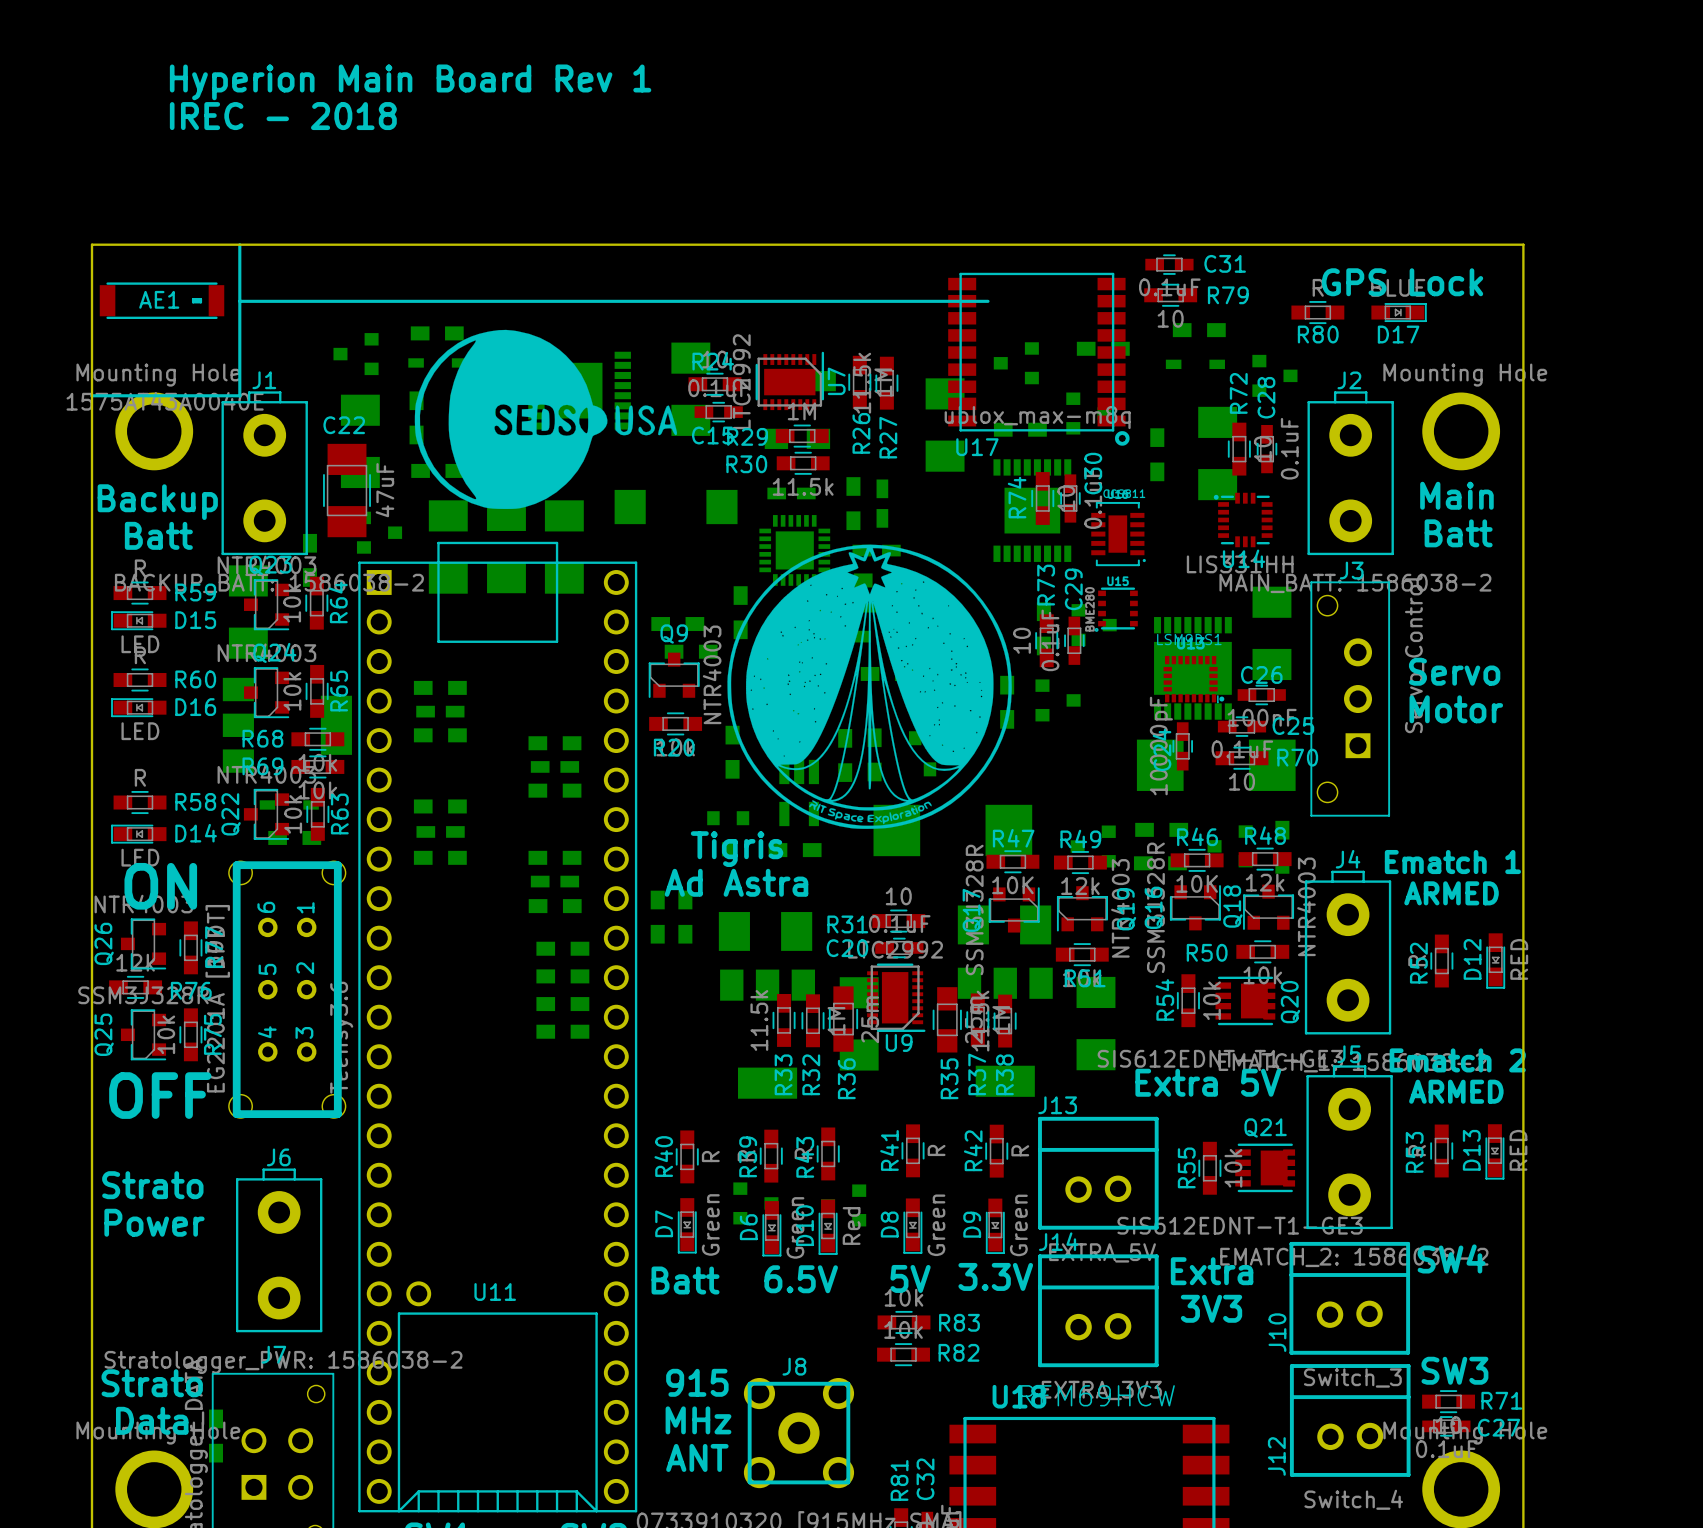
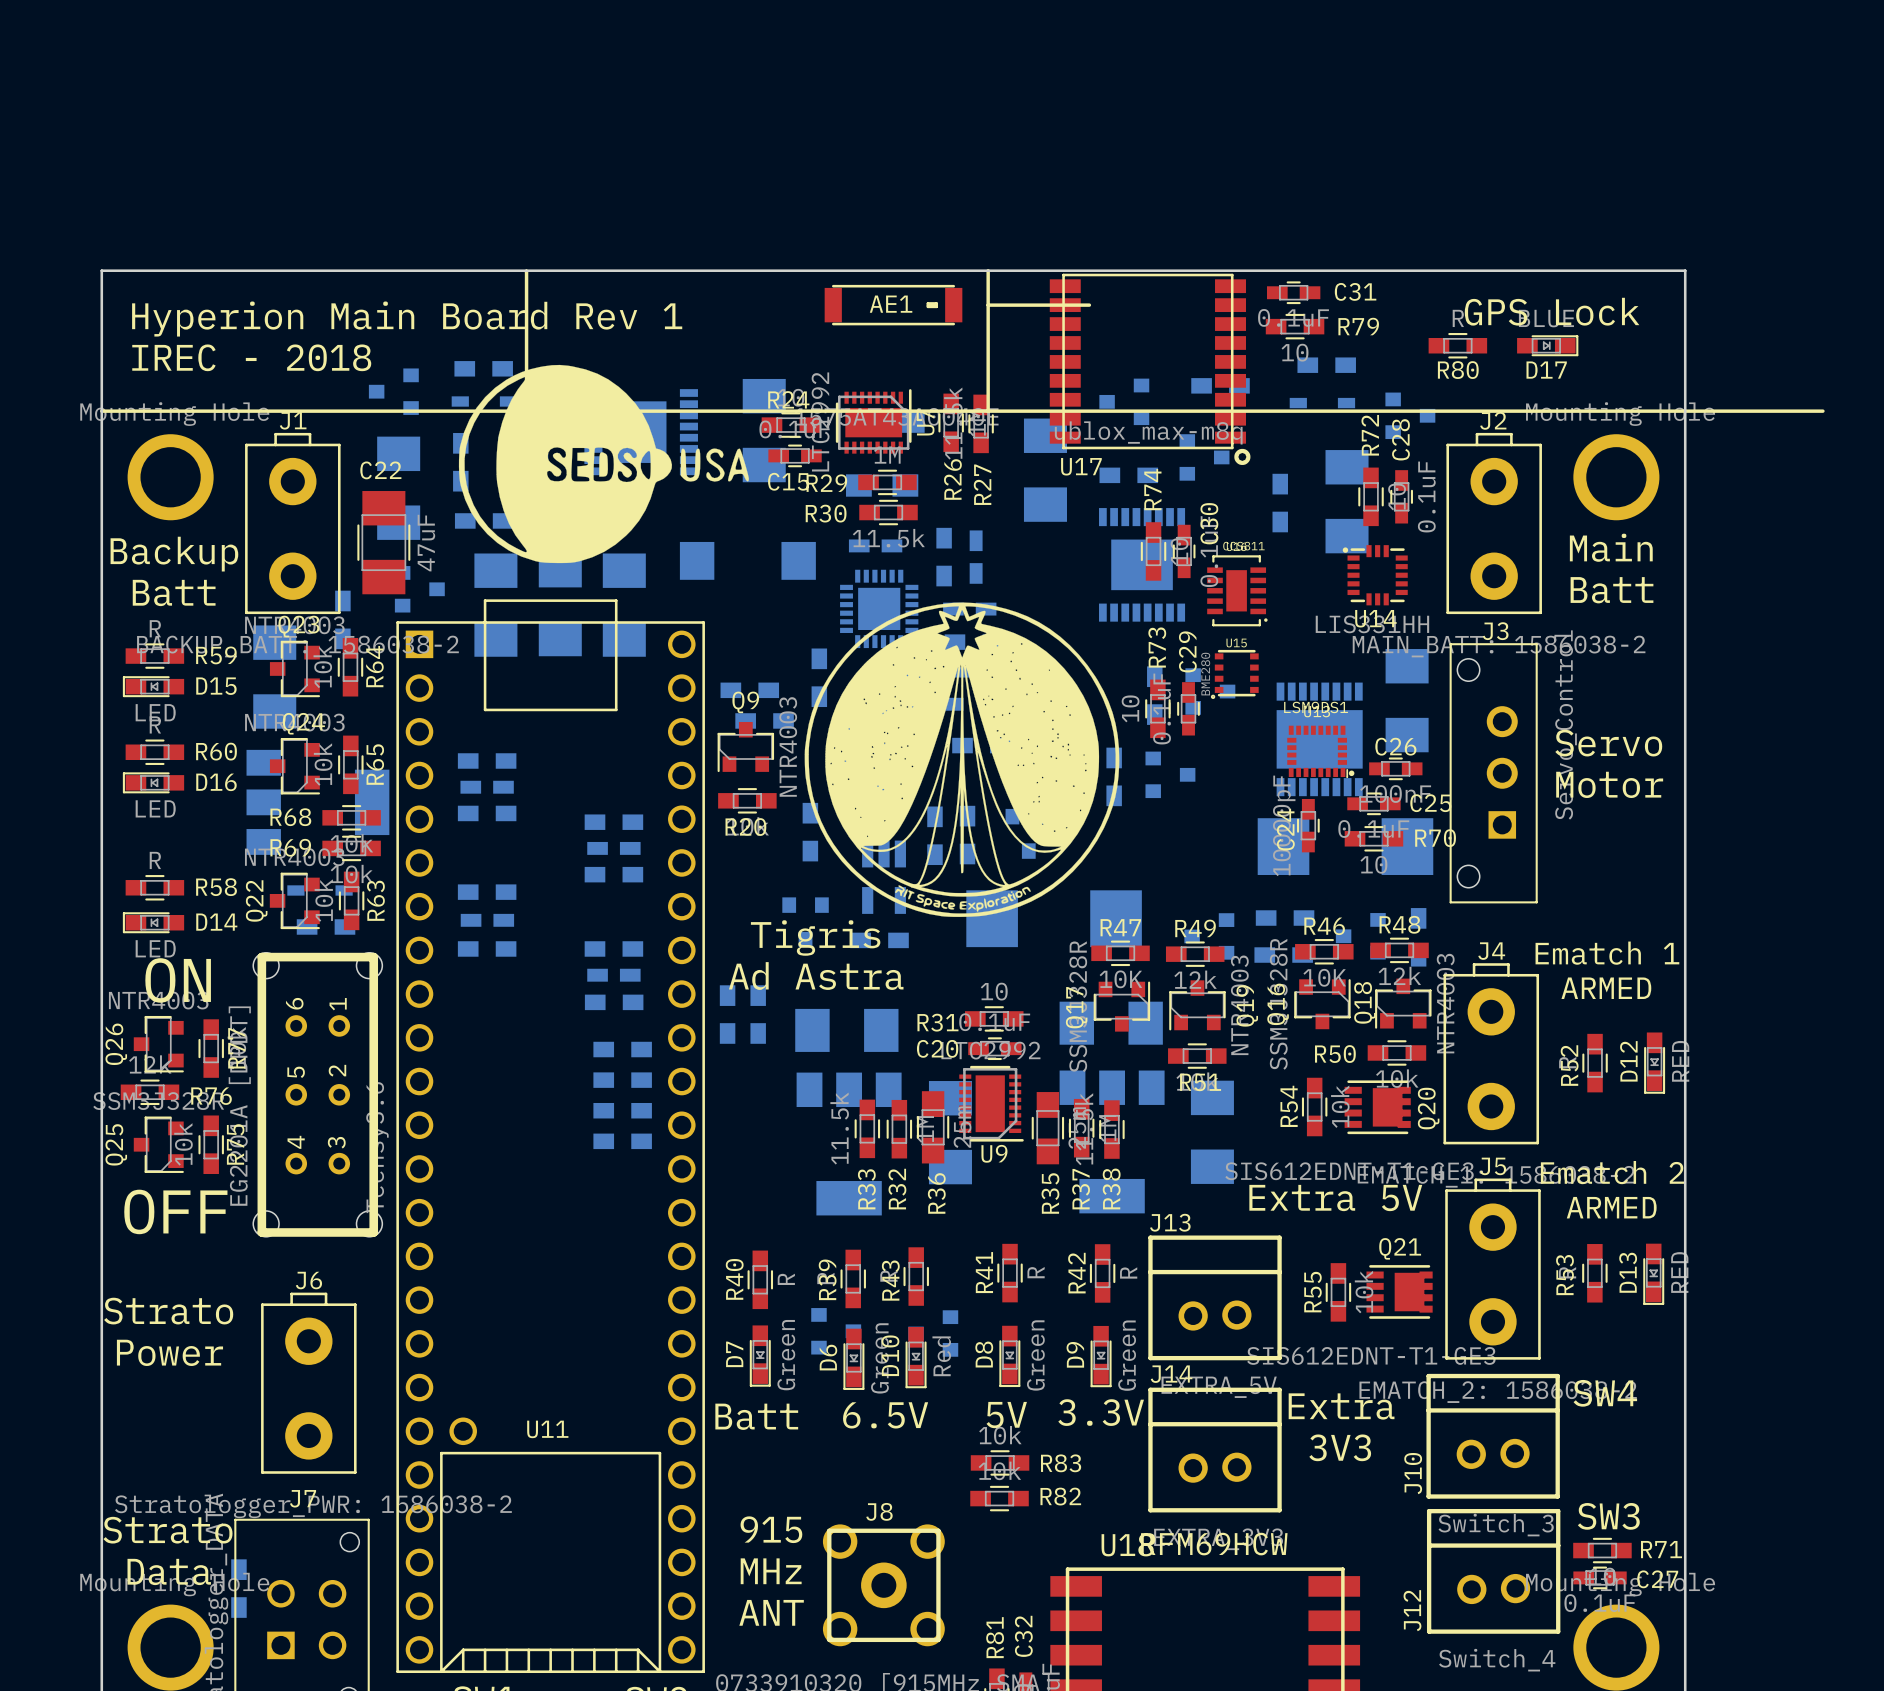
text position: Hyperion Main Board Rev 1 (410, 82) -> Hyperion Main Board Rev 1 (407, 319)
text position: IREC - 2018 (283, 116) -> IREC - 2018 (251, 357)
line: (239, 244) (239, 396) -> none
line: none -> (988, 270) (988, 411)
line: none -> (526, 271) (526, 413)
line: none -> (988, 305) (1089, 305)
AE1 position: (162, 300) -> (893, 305)
line: (239, 301) (988, 301) -> none
U17 position: (1038, 359) -> (1150, 369)
line: none -> (101, 411) (1822, 411)
line: (91, 395) (239, 395) -> none
R74 name position: R74 (1017, 497) -> R74 (1152, 489)

